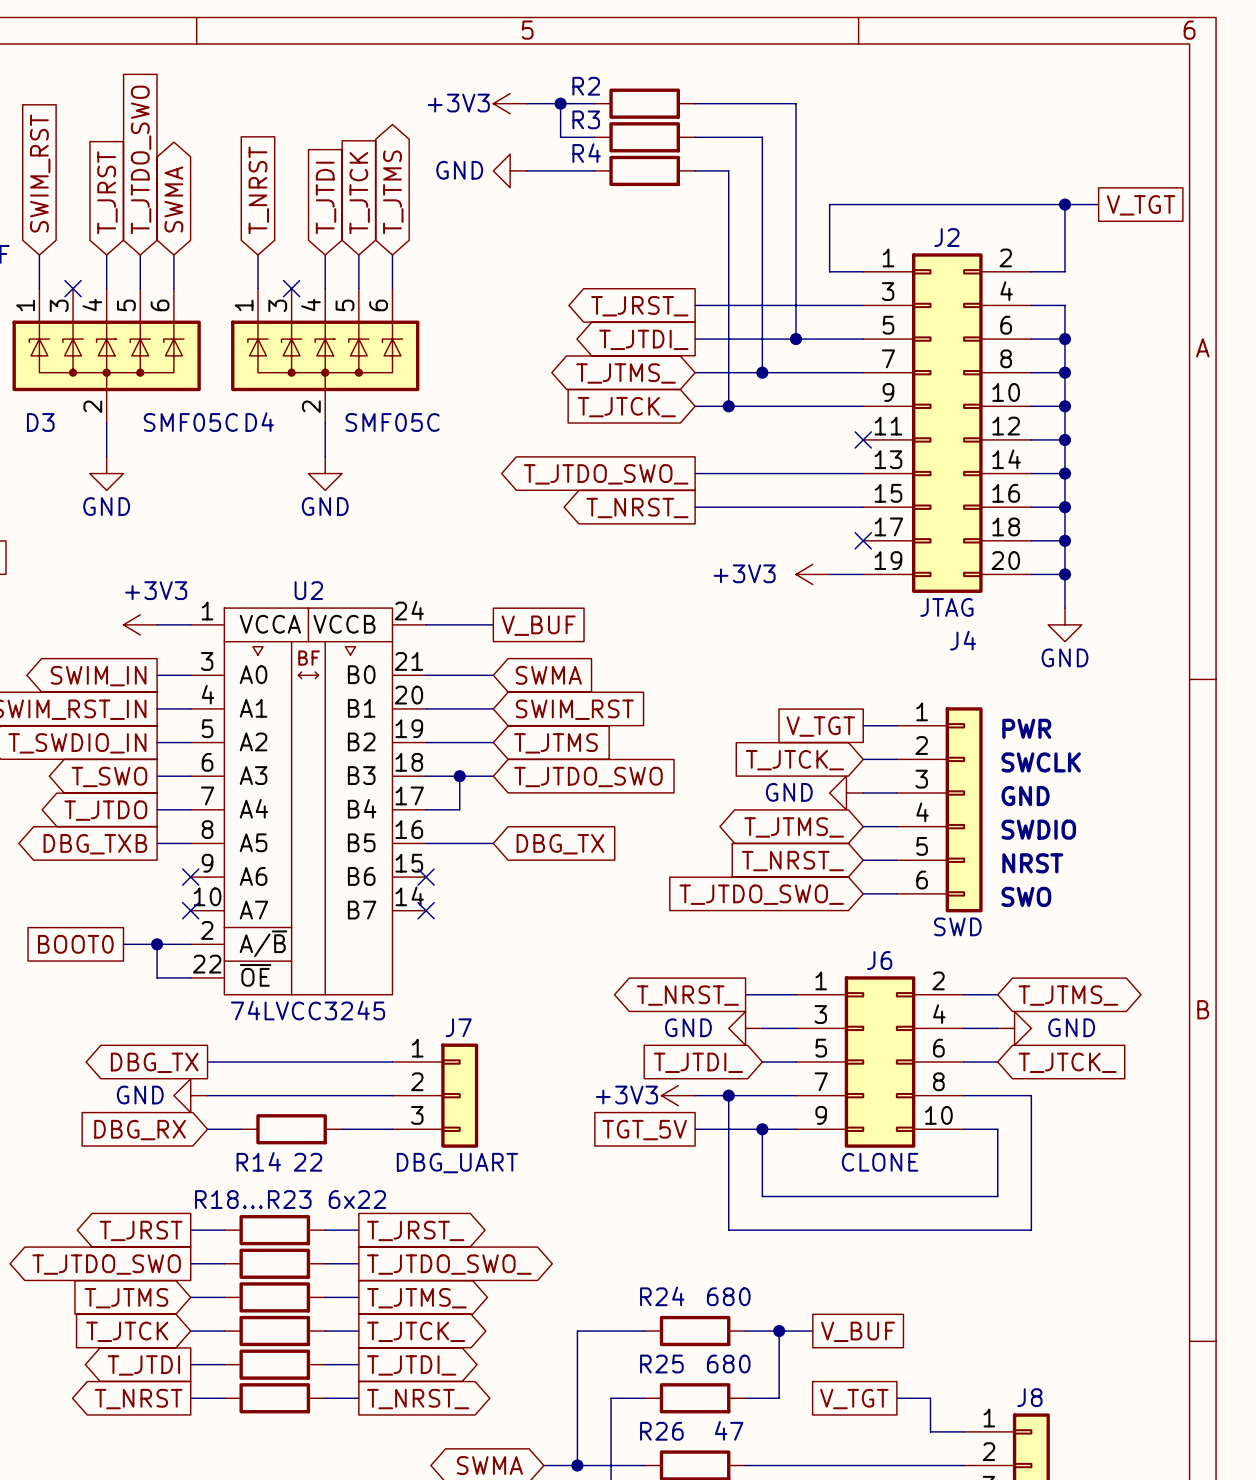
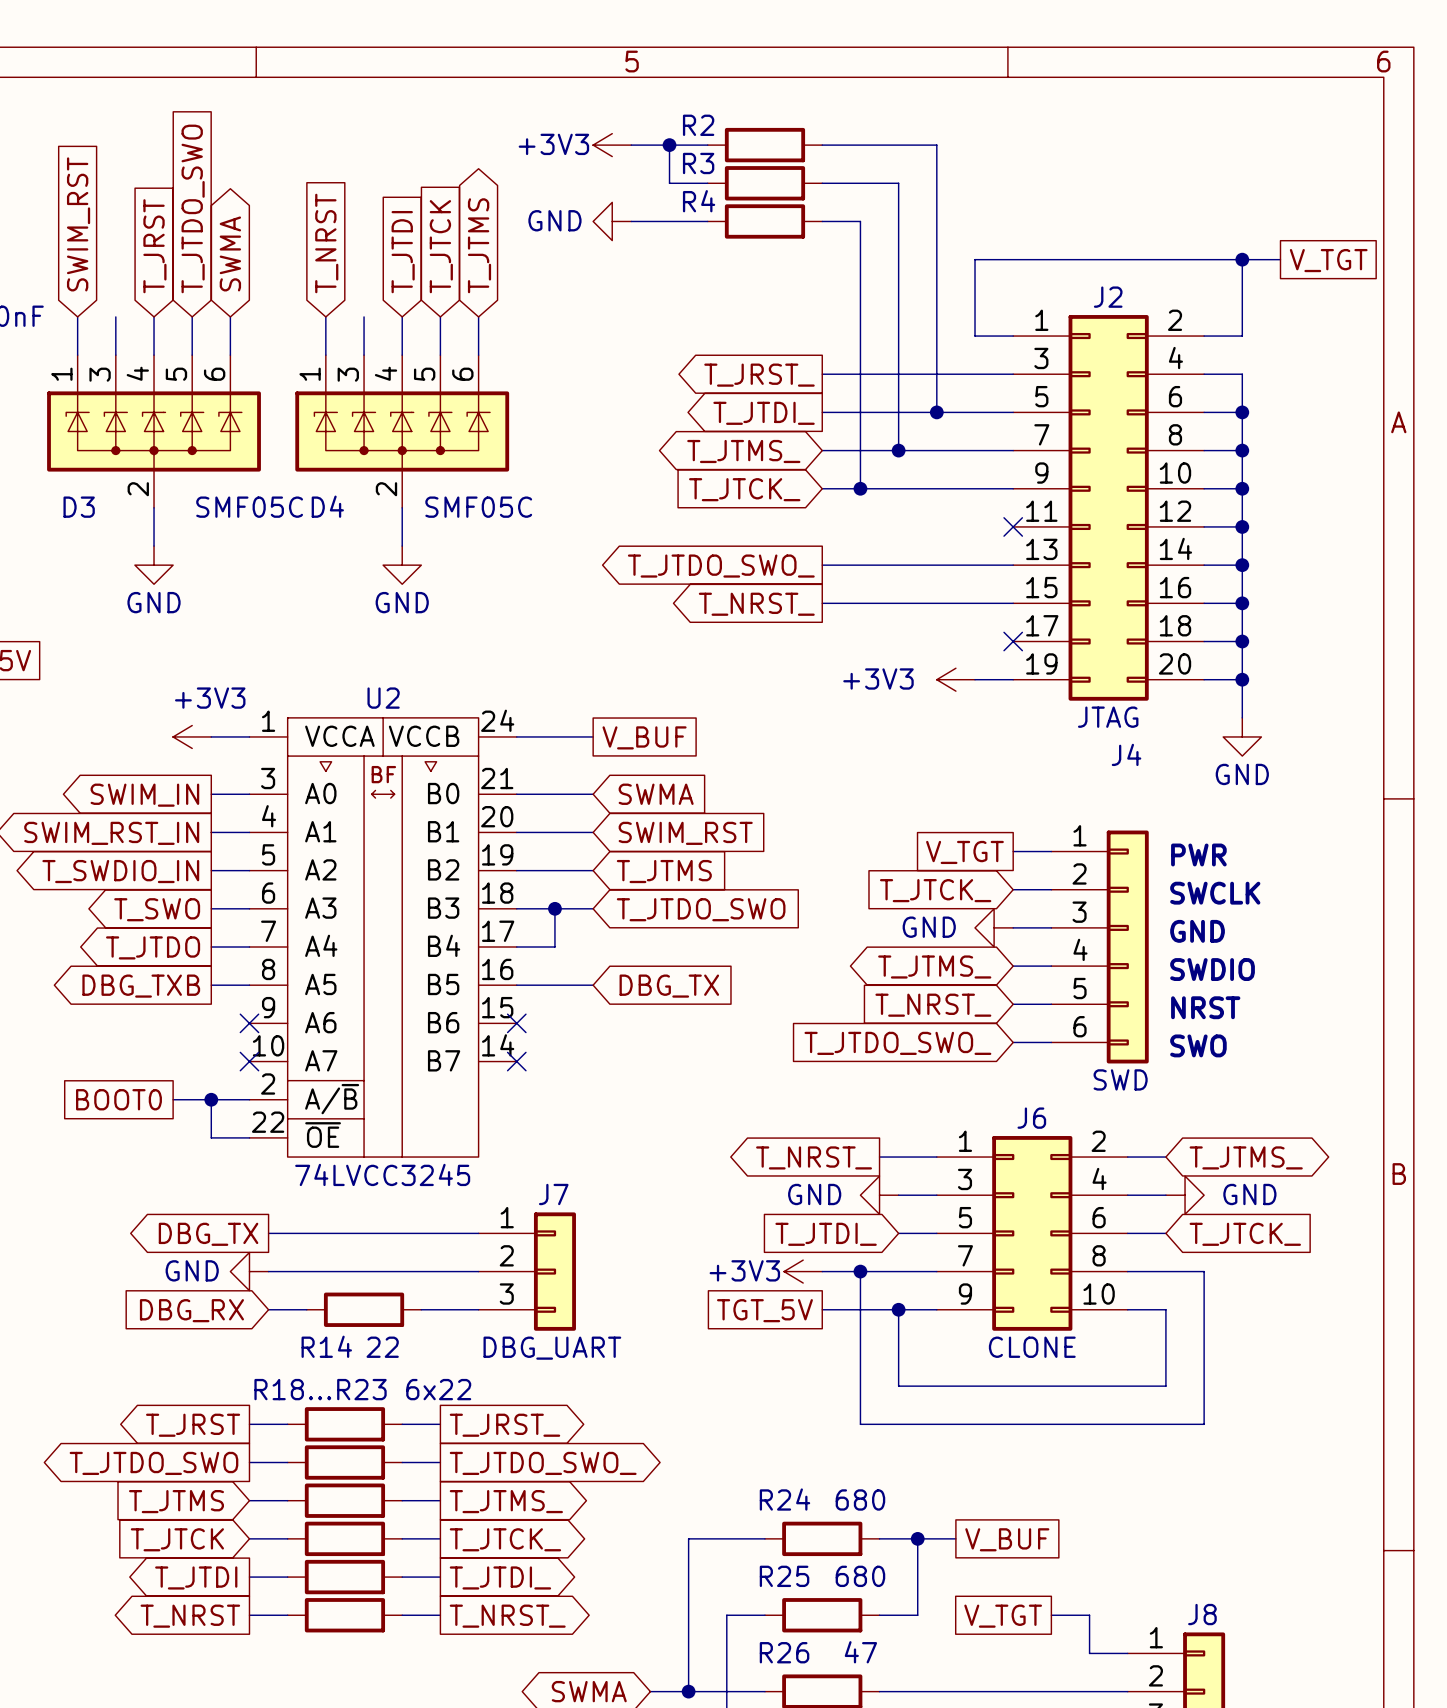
wire: none -> (115, 316) (115, 355)
wire: none -> (364, 316) (364, 355)
no-connect mark: (73, 288) -> none
no-connect mark: (291, 288) -> none

